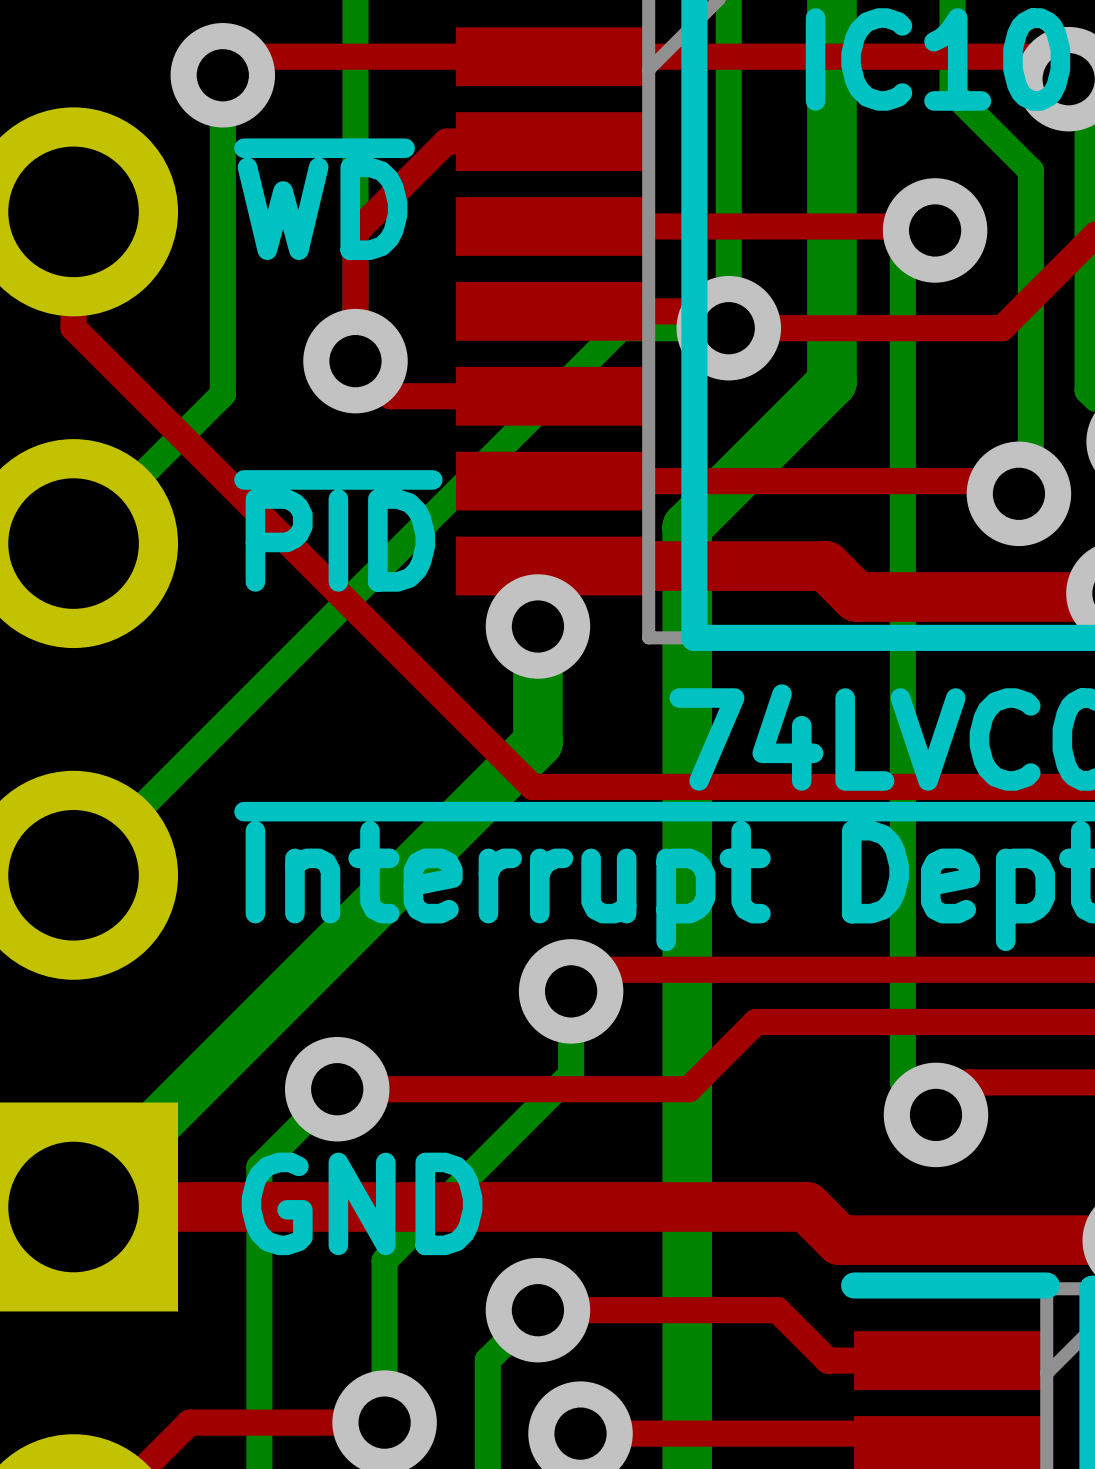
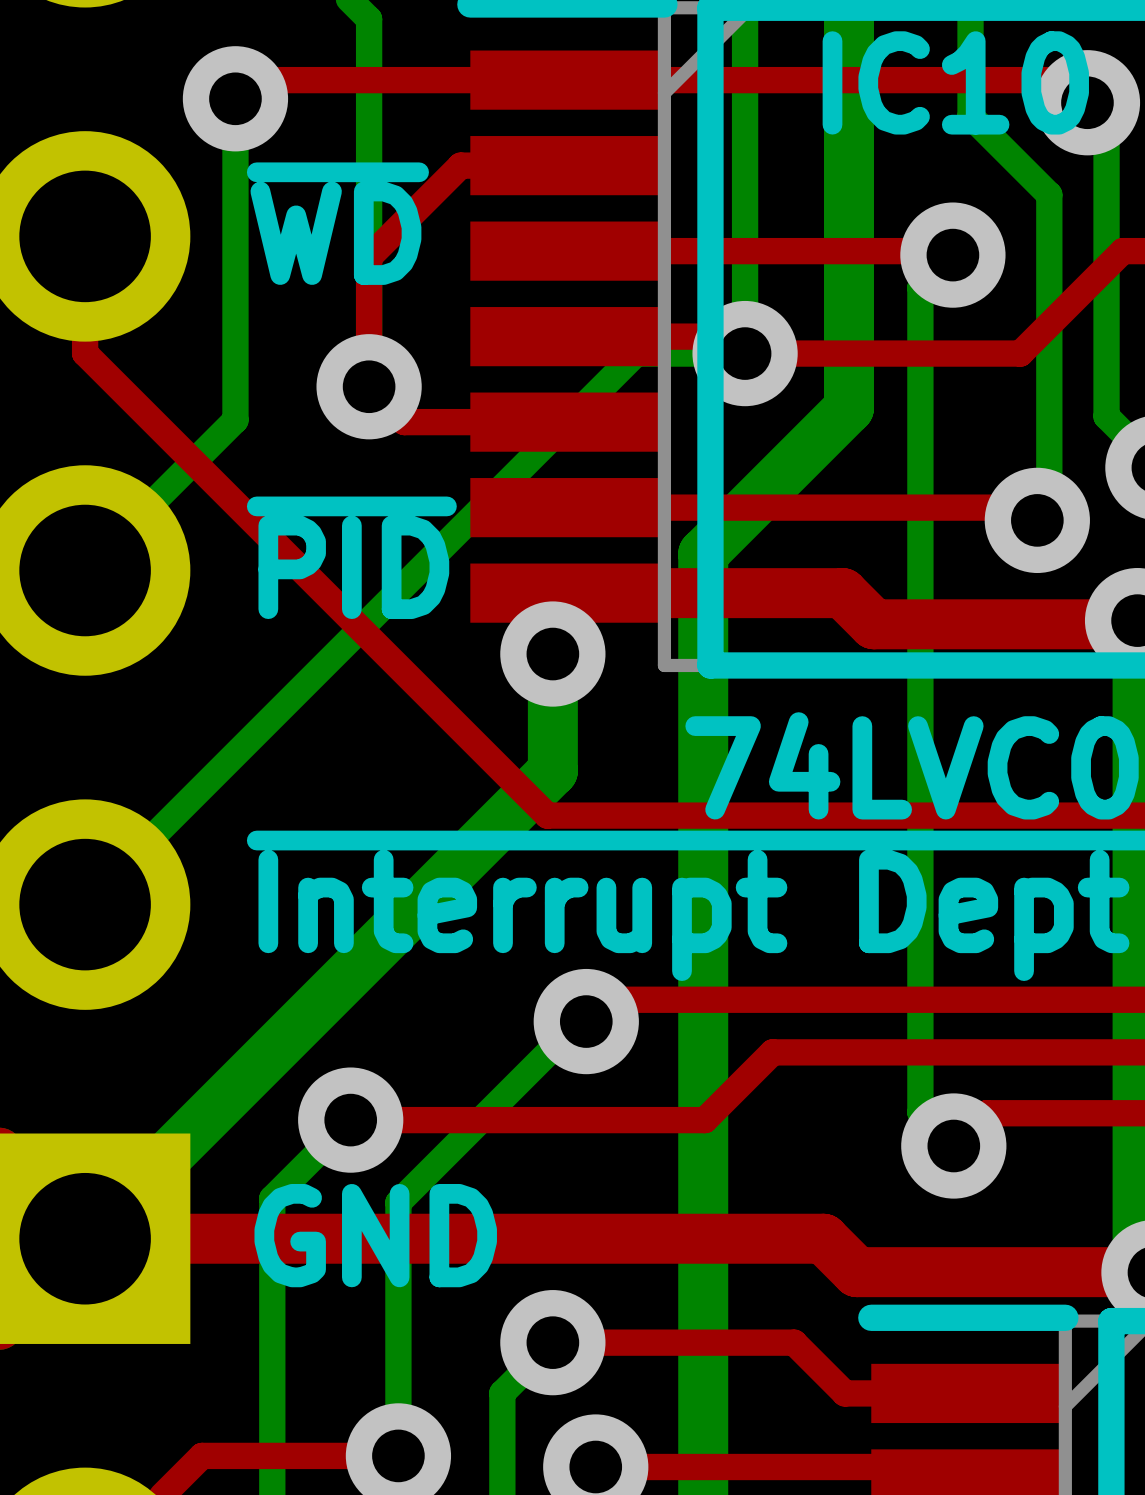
bottom track: (571, 991) (571, 1074) (384, 1260) -> (586, 1021) (579, 1021) (398, 1202) (398, 1292)

